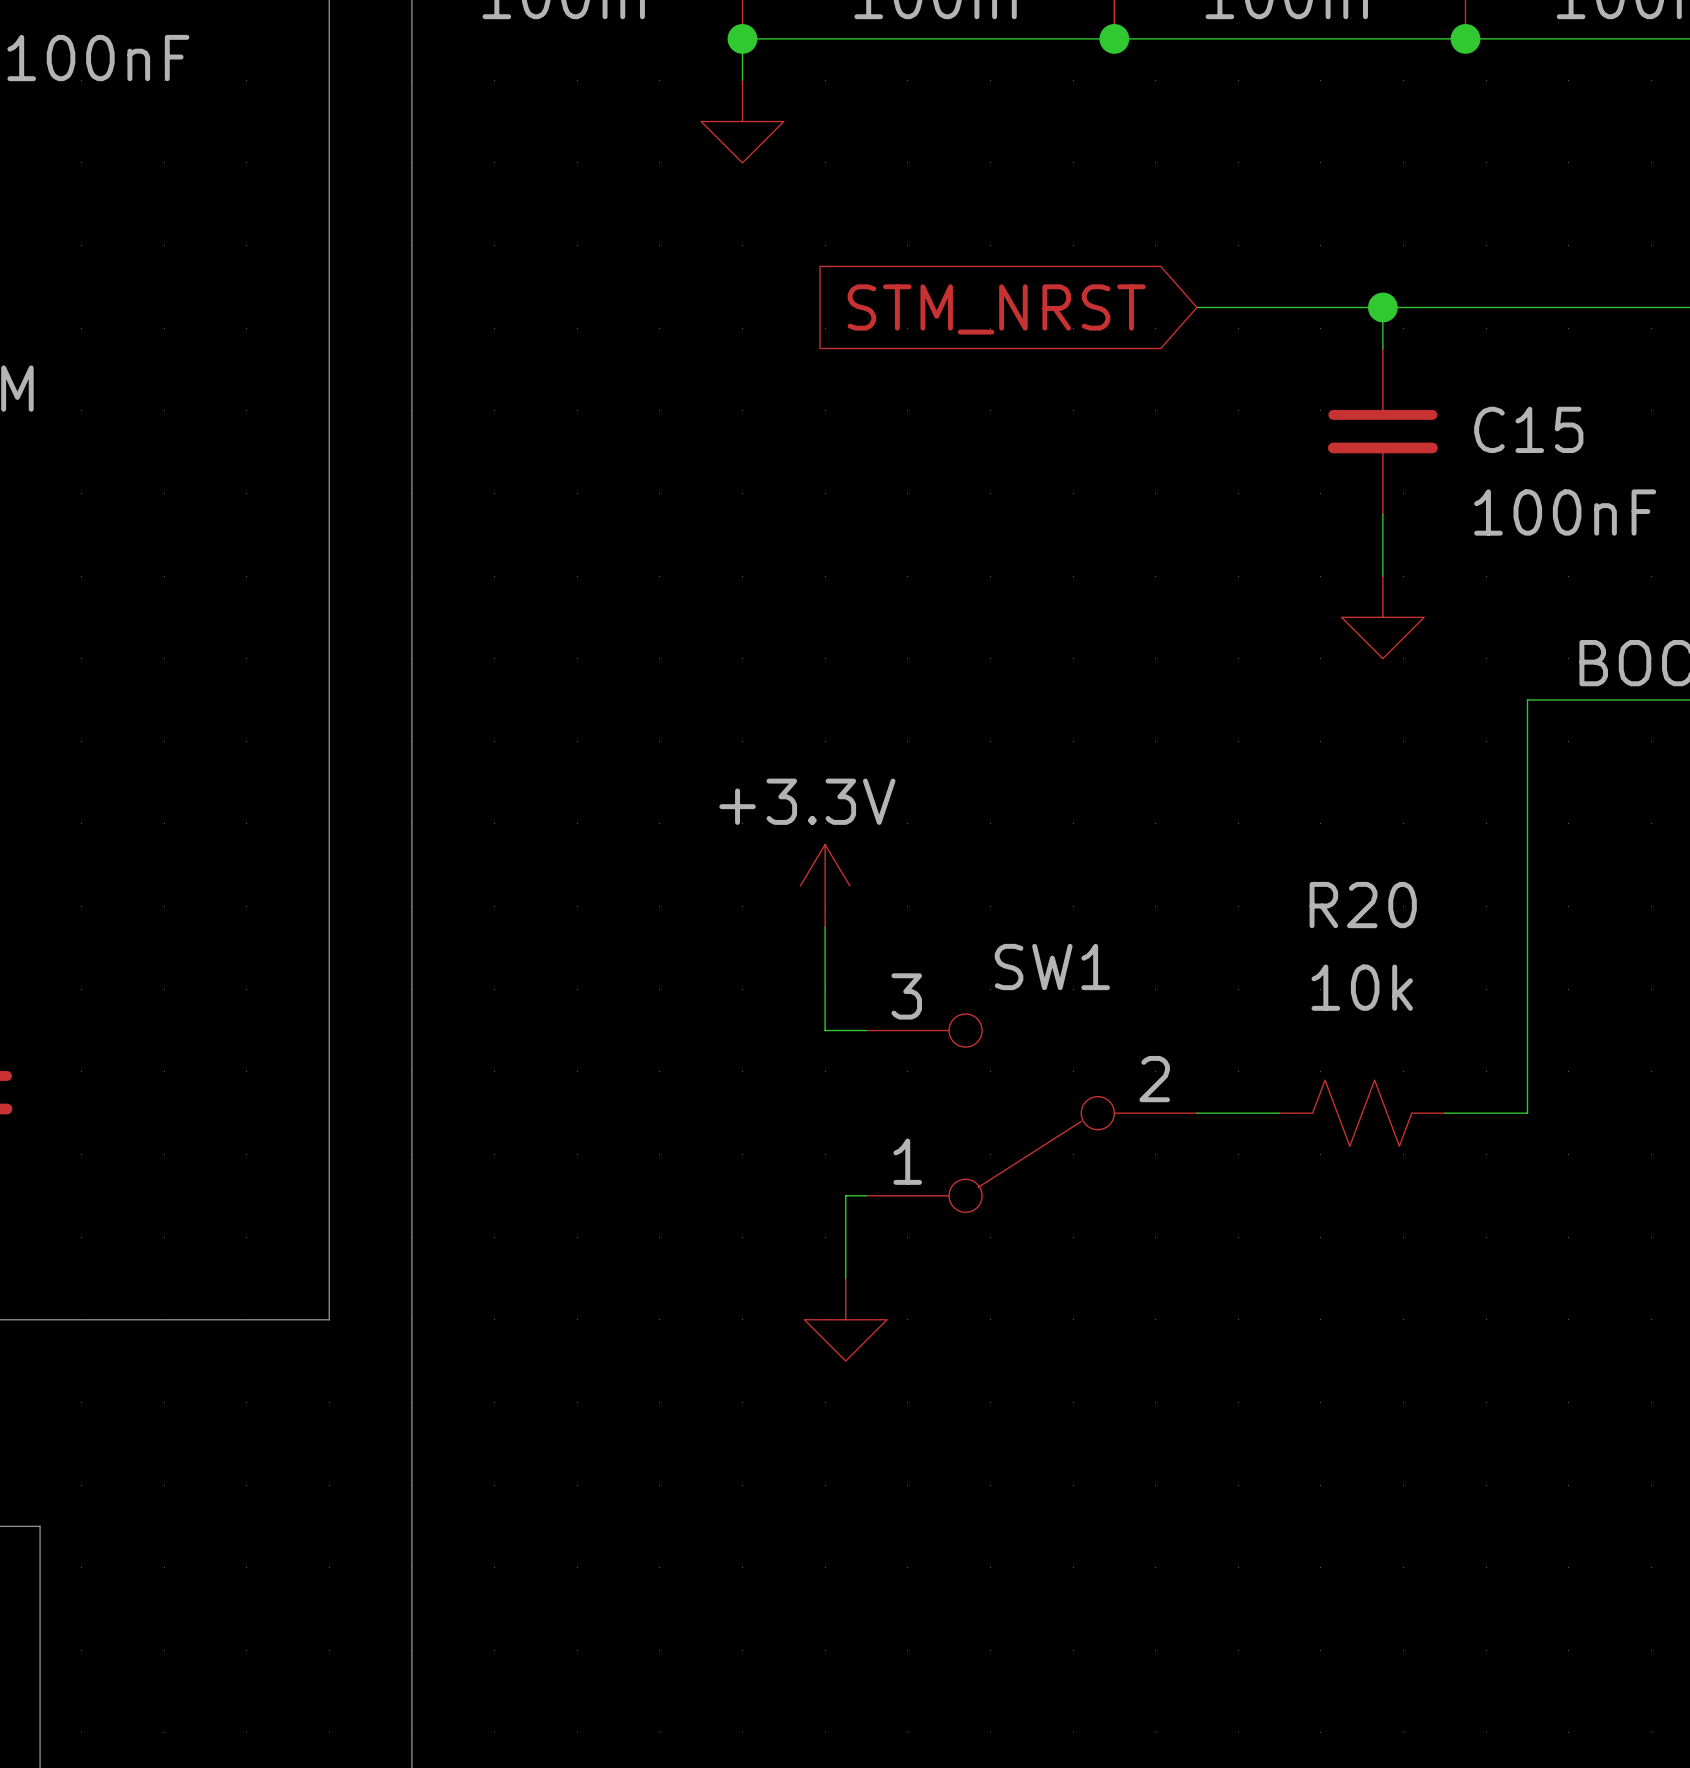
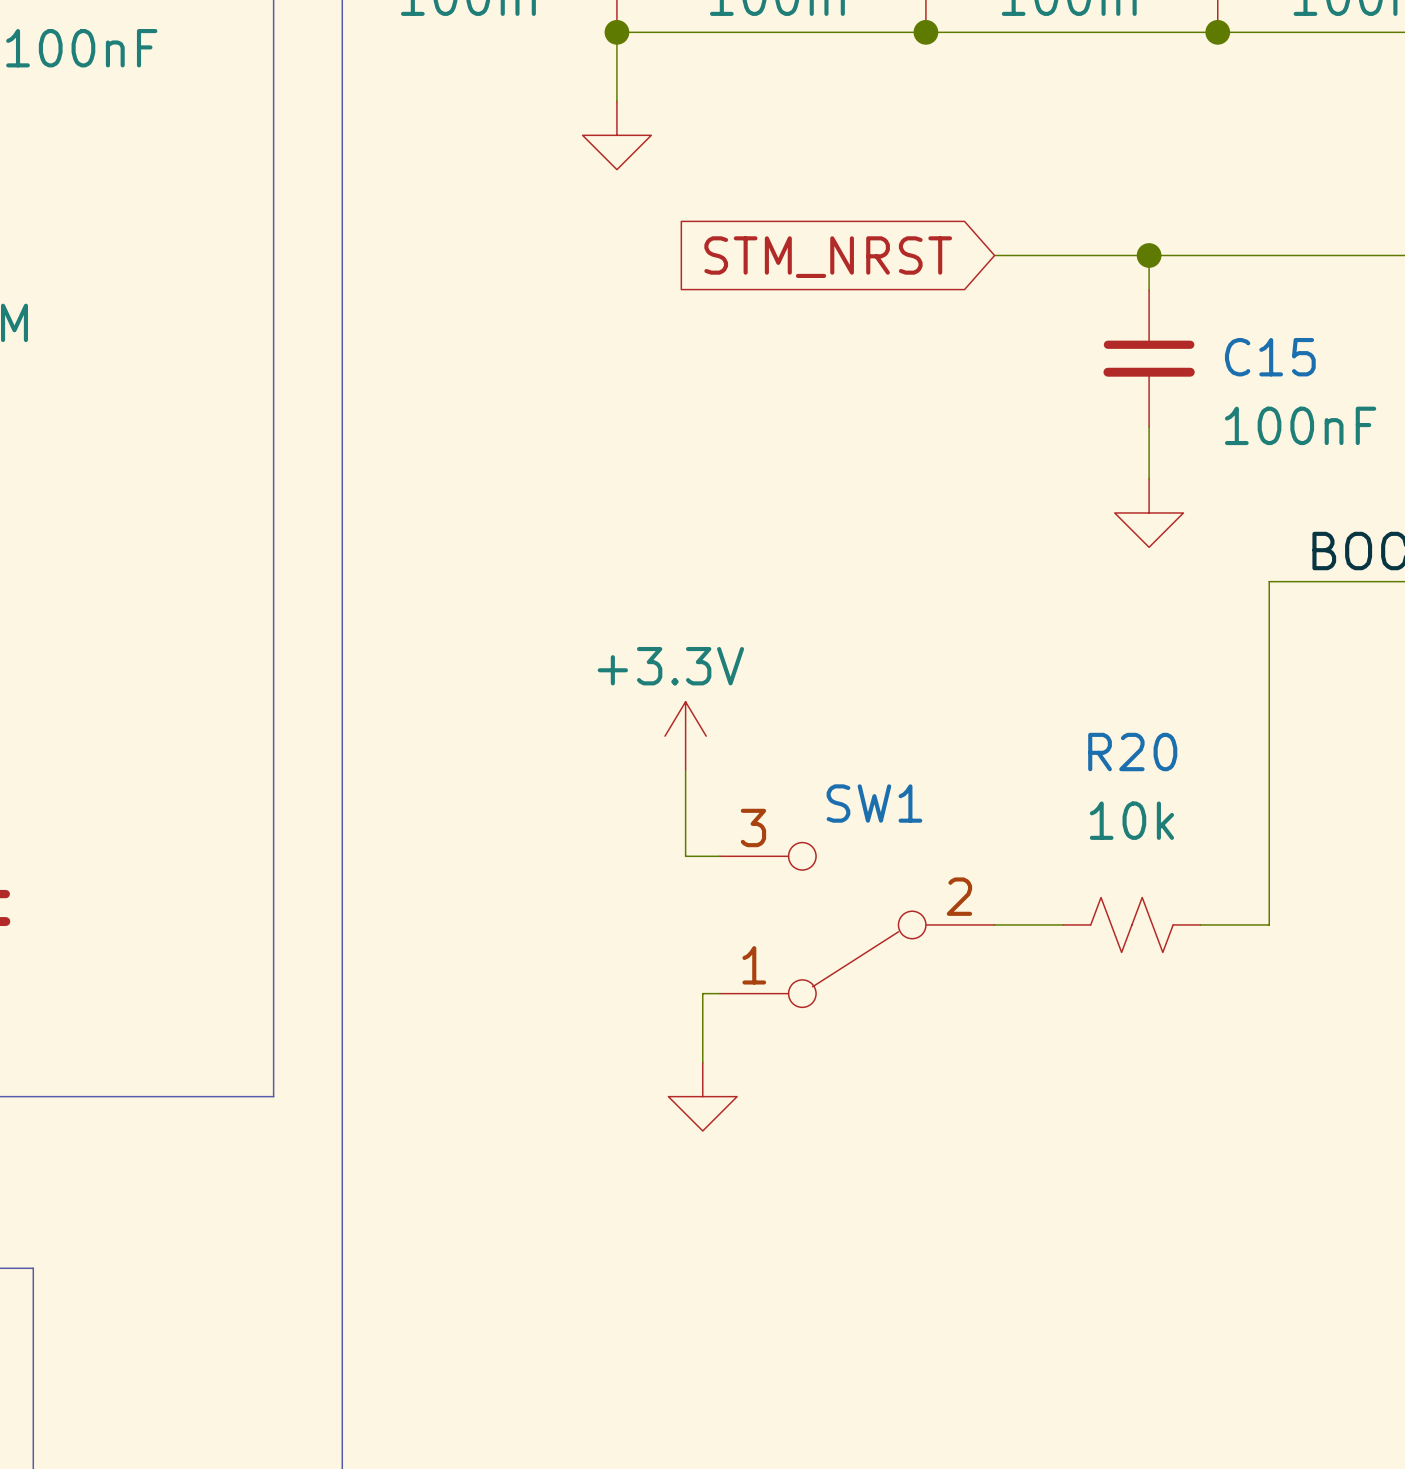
power symbol position: (742, 121) -> (616, 135)

